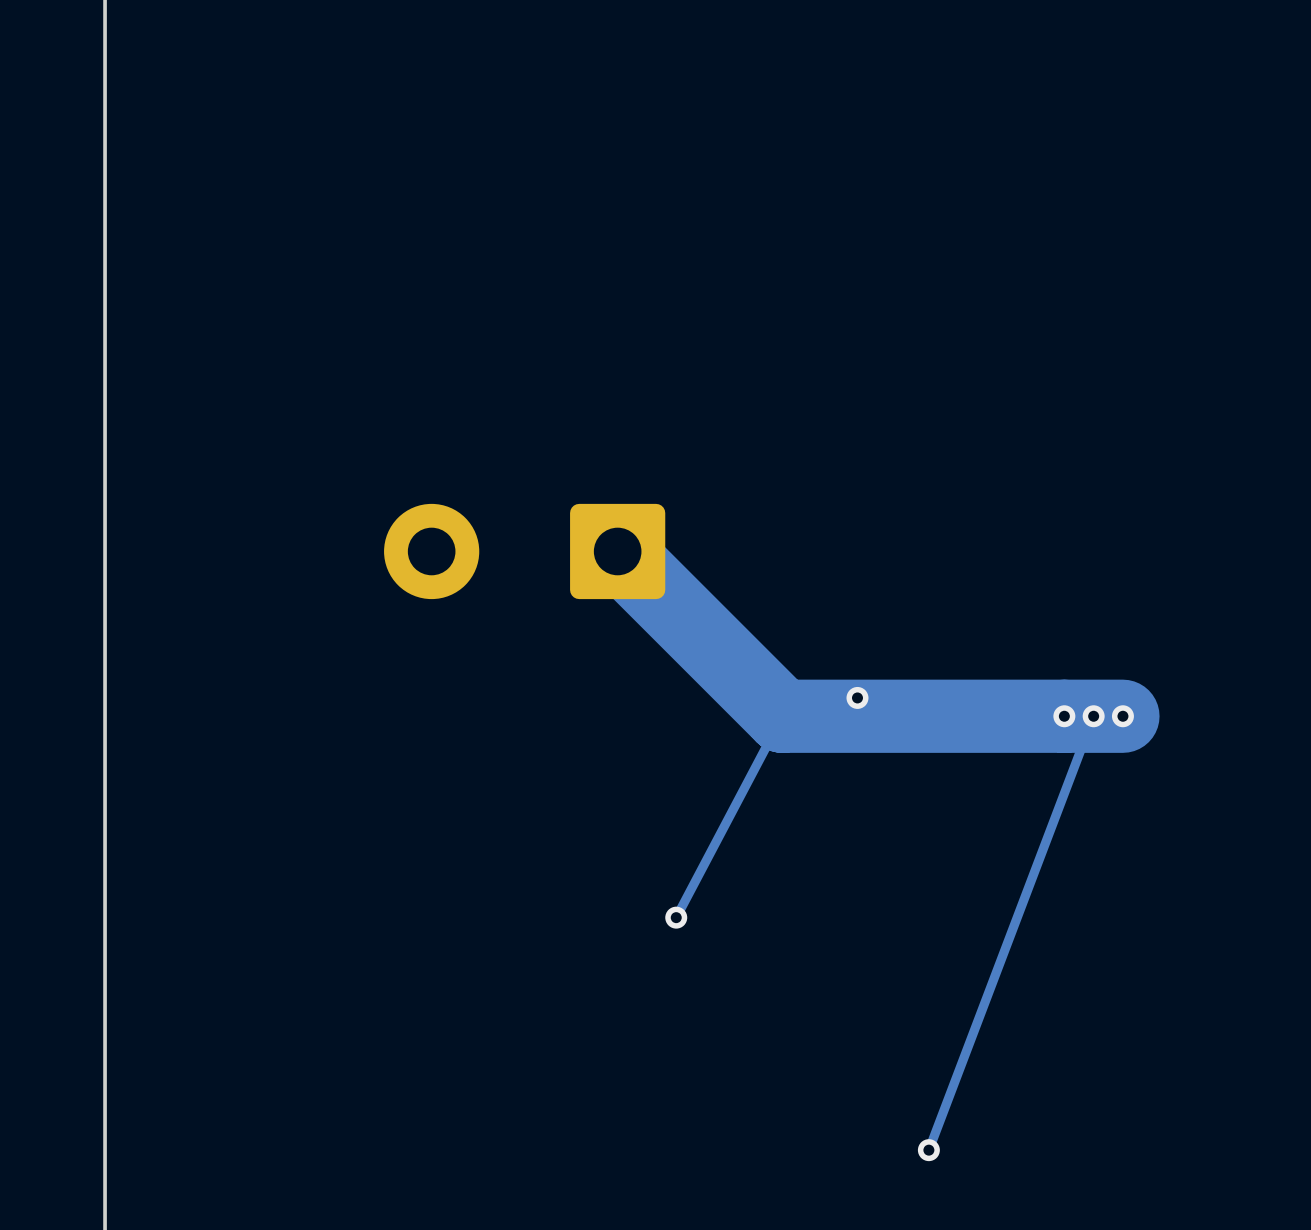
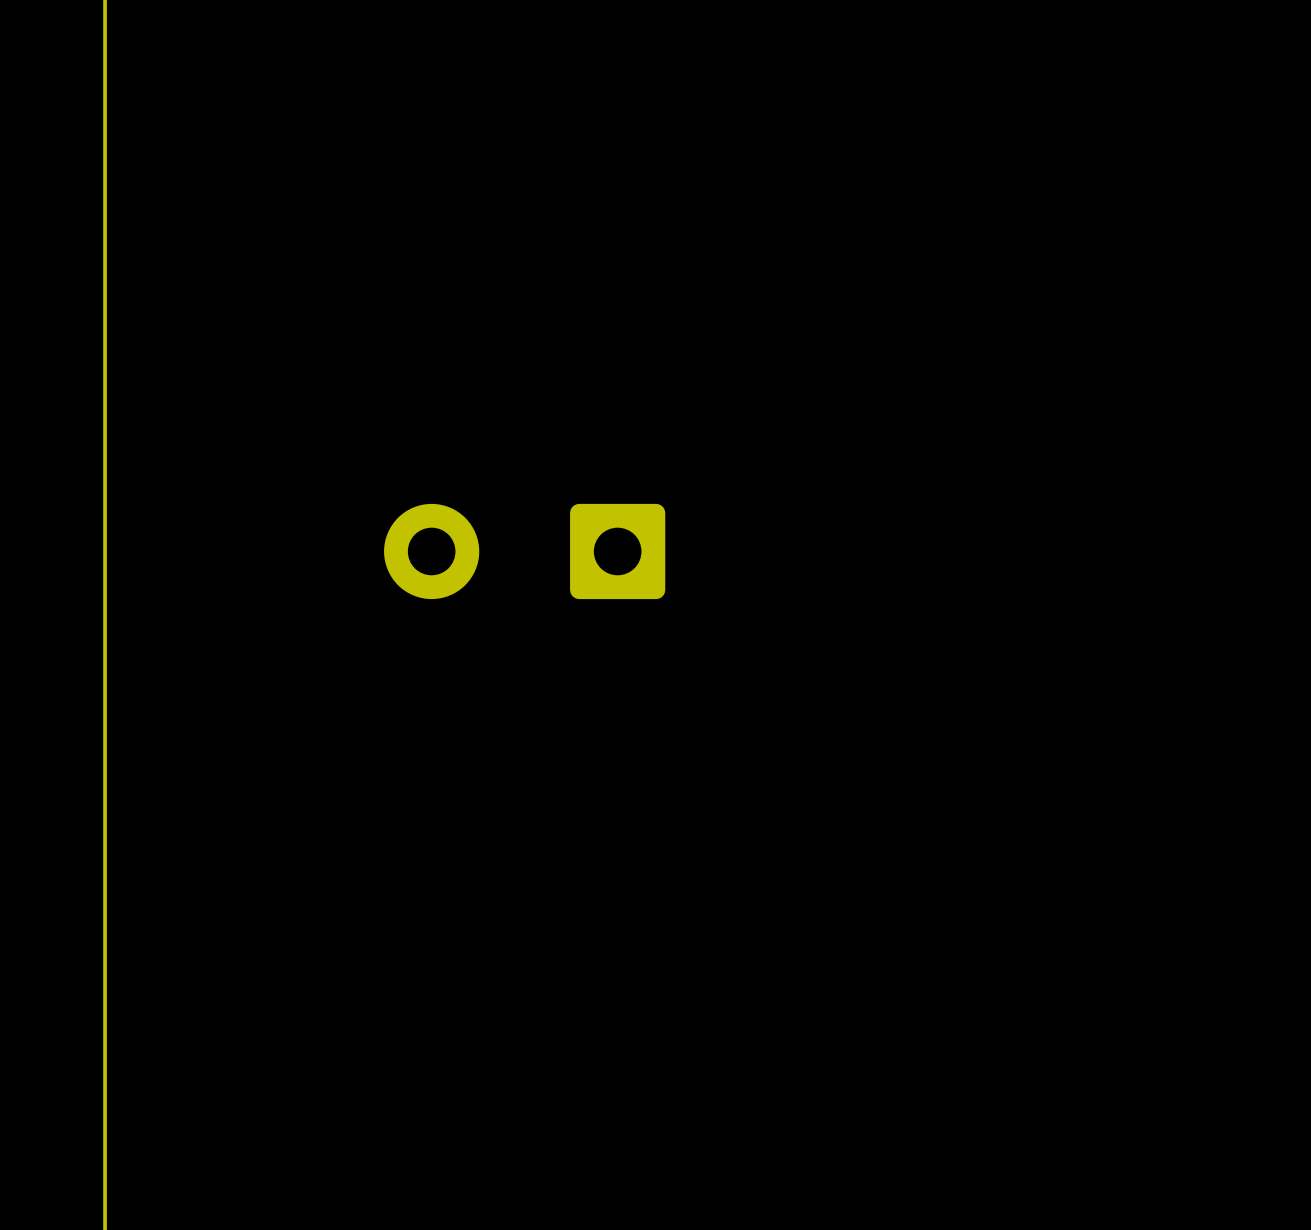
track: (617, 551) (782, 716) -> none
via: (857, 697) -> none
track: (782, 716) (676, 917) -> none
via: (1064, 716) -> none
track: (1093, 716) (928, 1150) -> none
via: (1093, 716) -> none
track: (1122, 716) (782, 716) -> none
via: (1122, 716) -> none
via: (676, 917) -> none
via: (928, 1150) -> none

